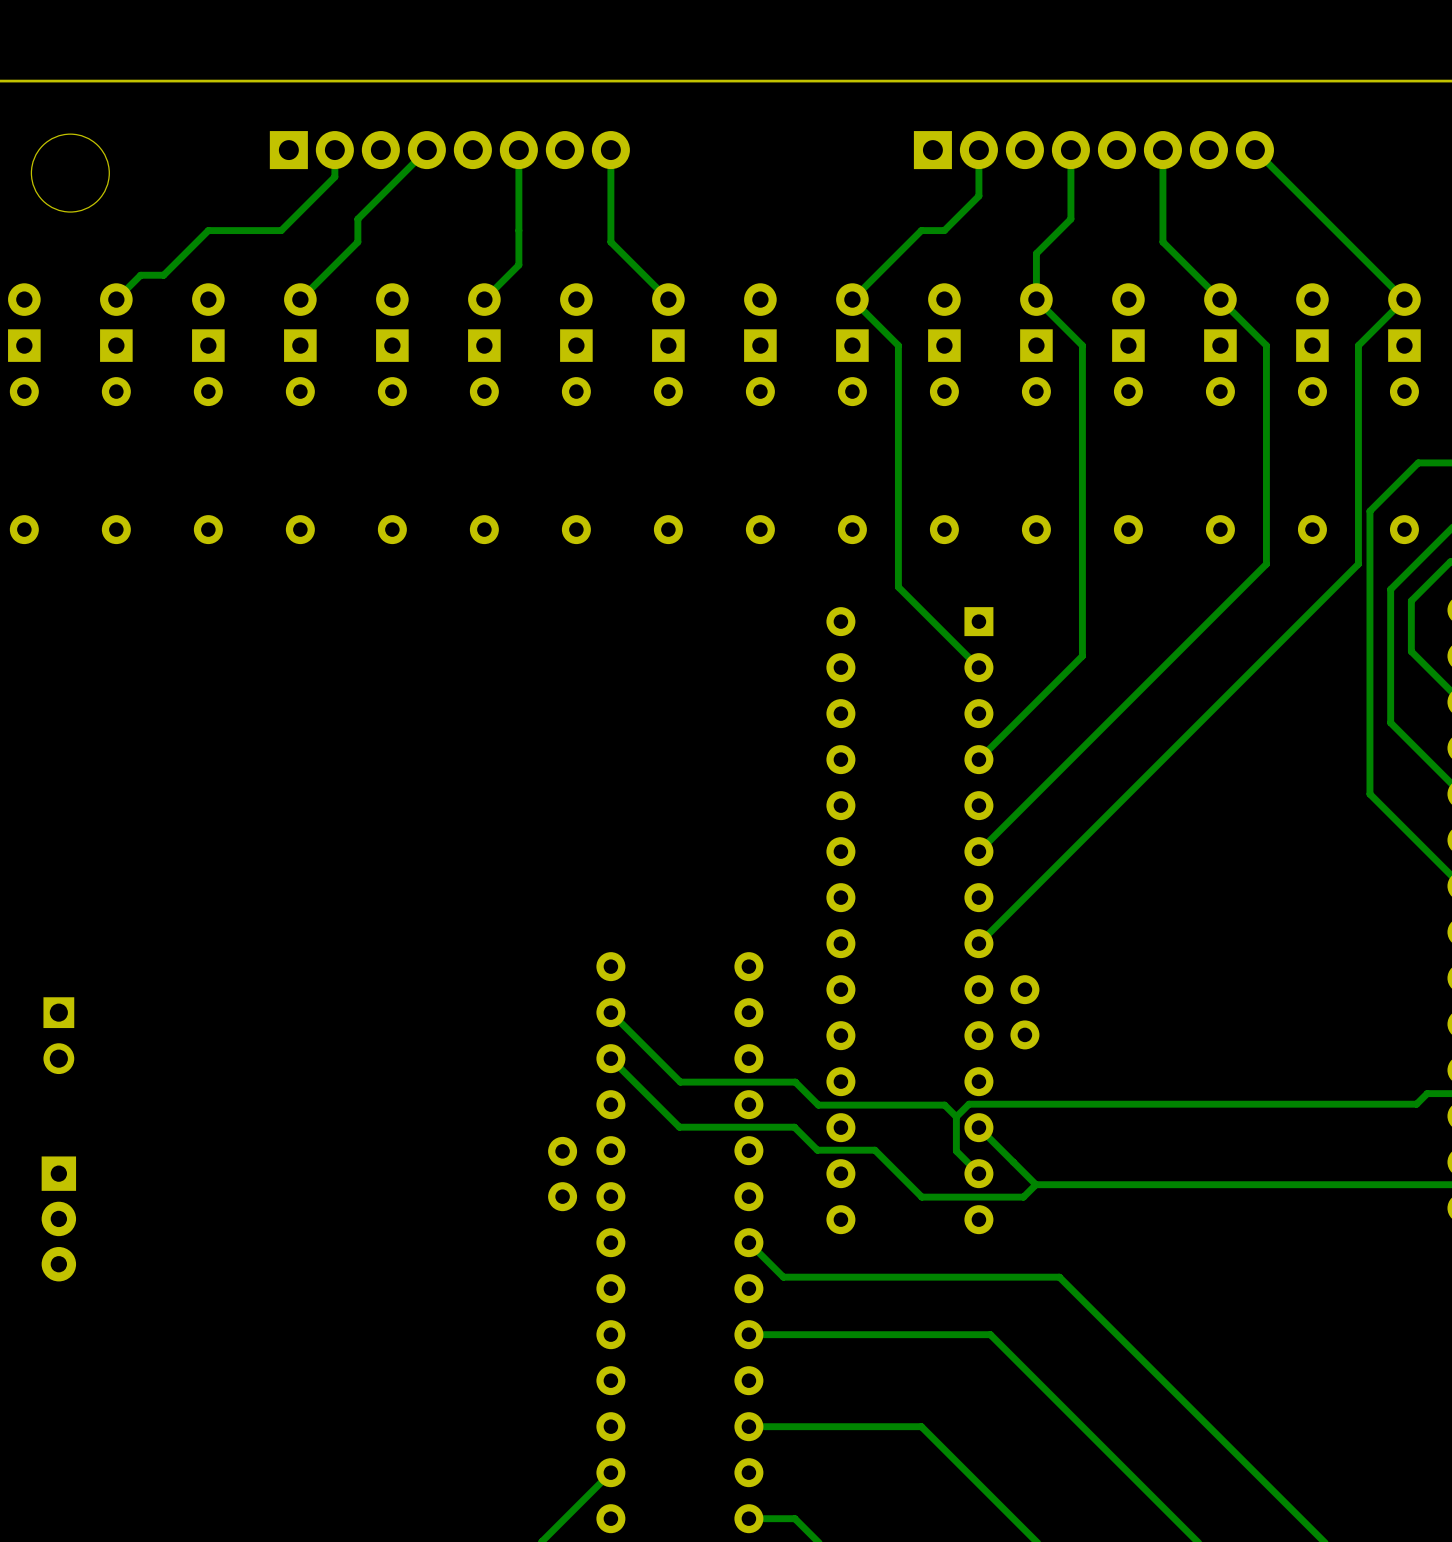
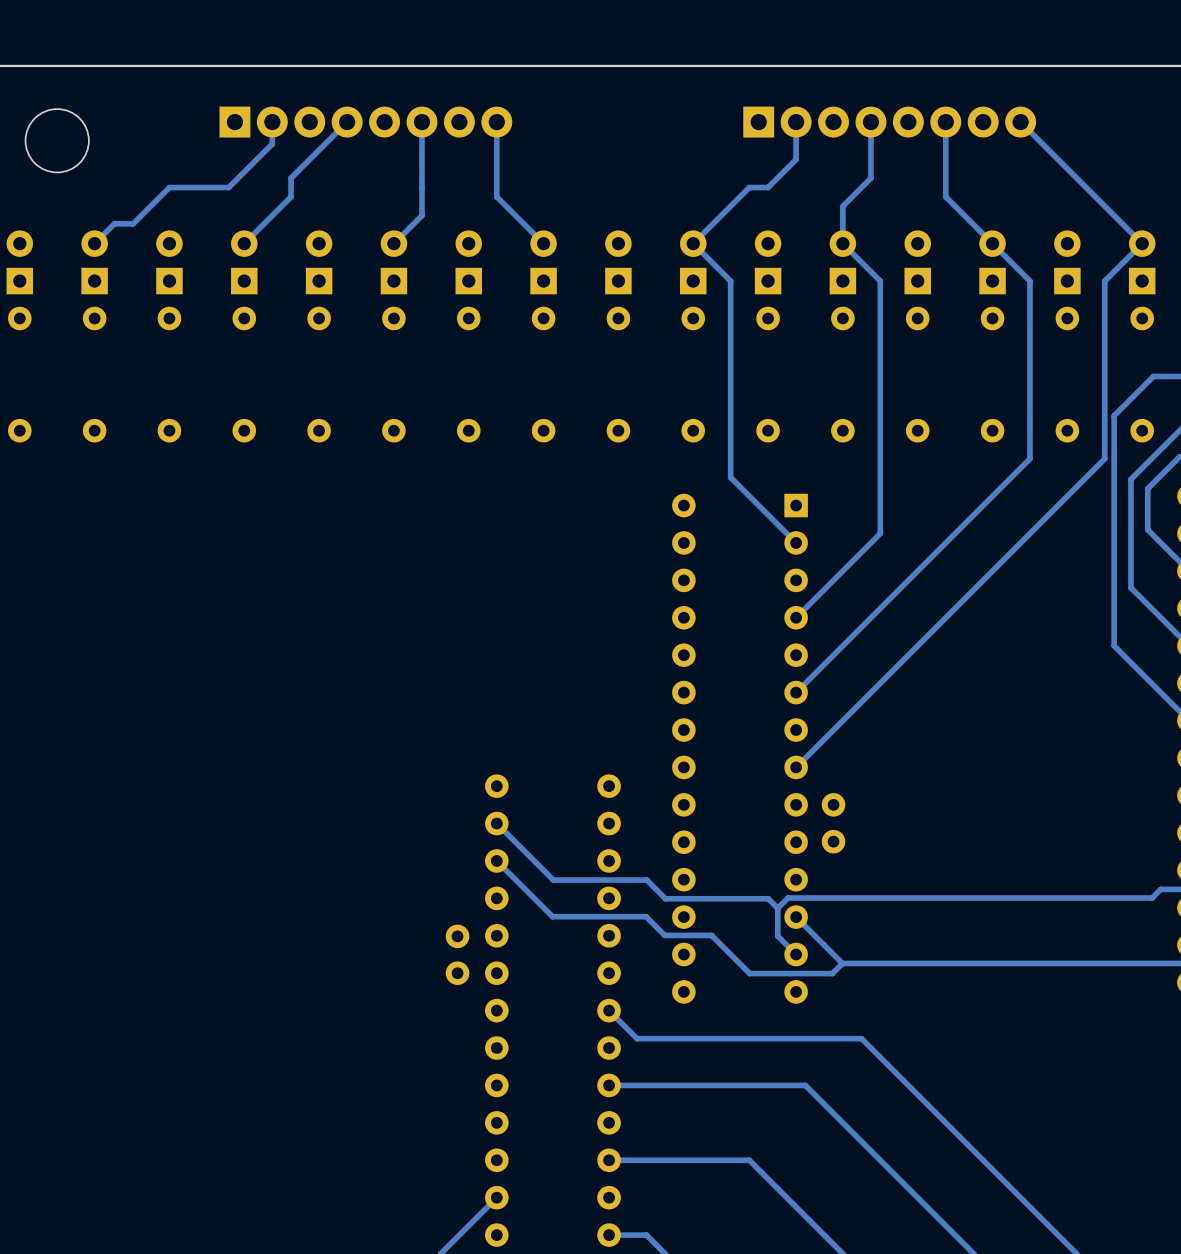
part: (58, 1035) -> none
part: (58, 1218) -> none

